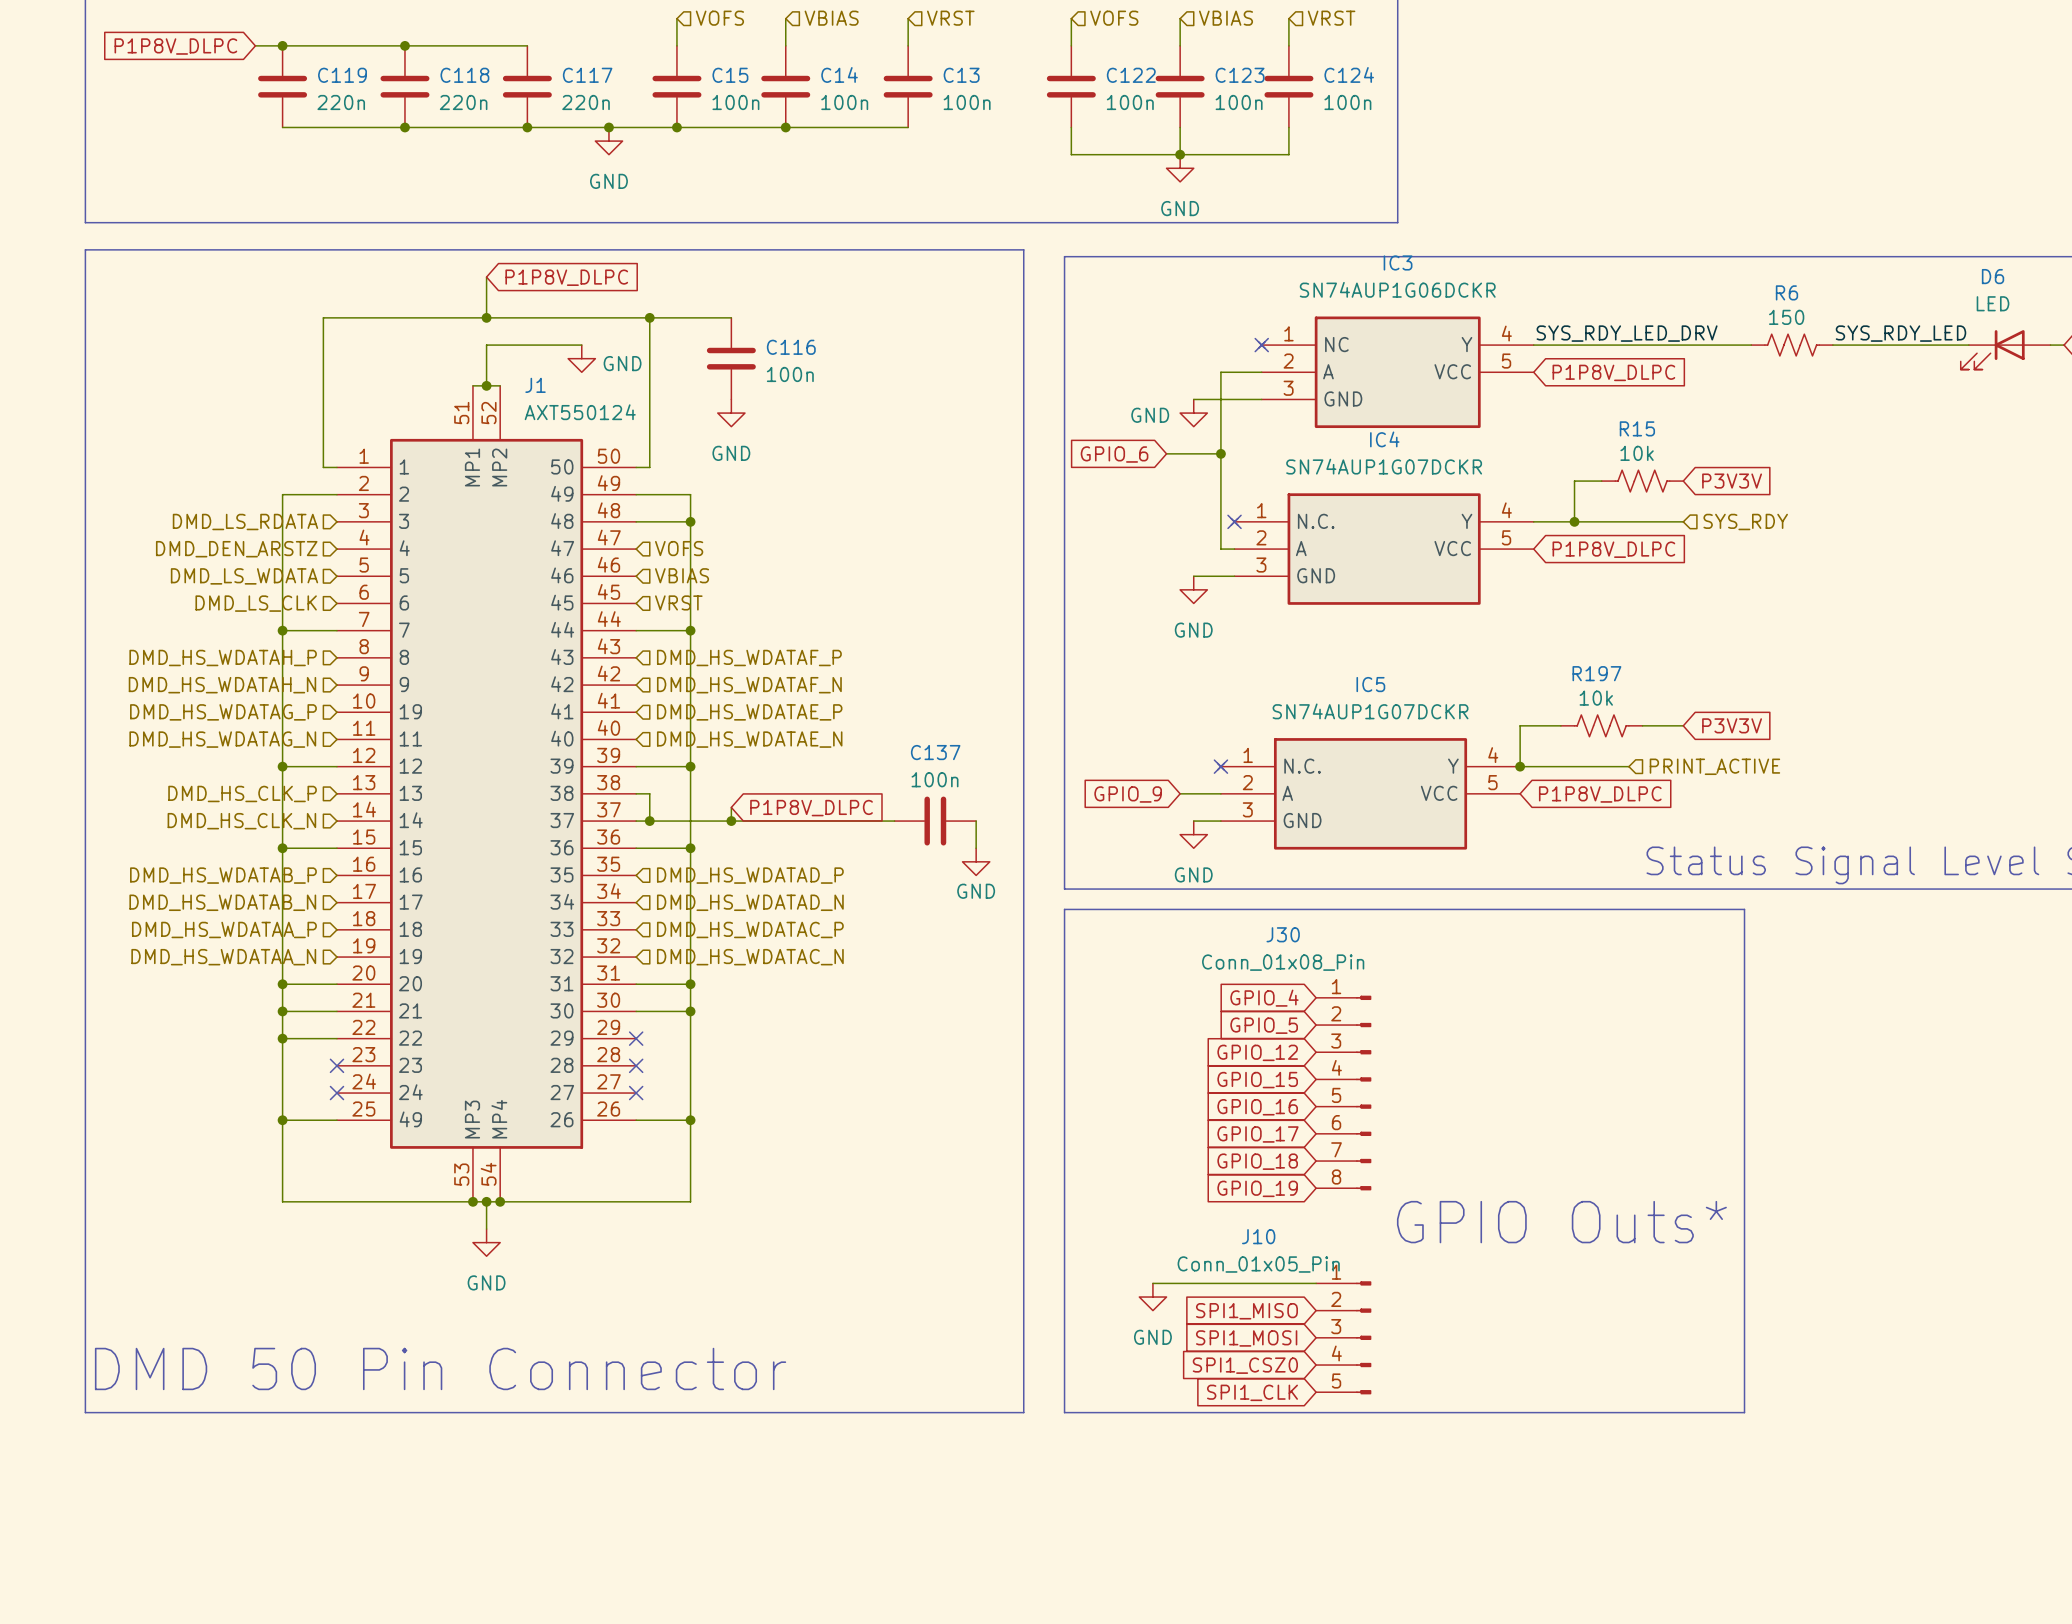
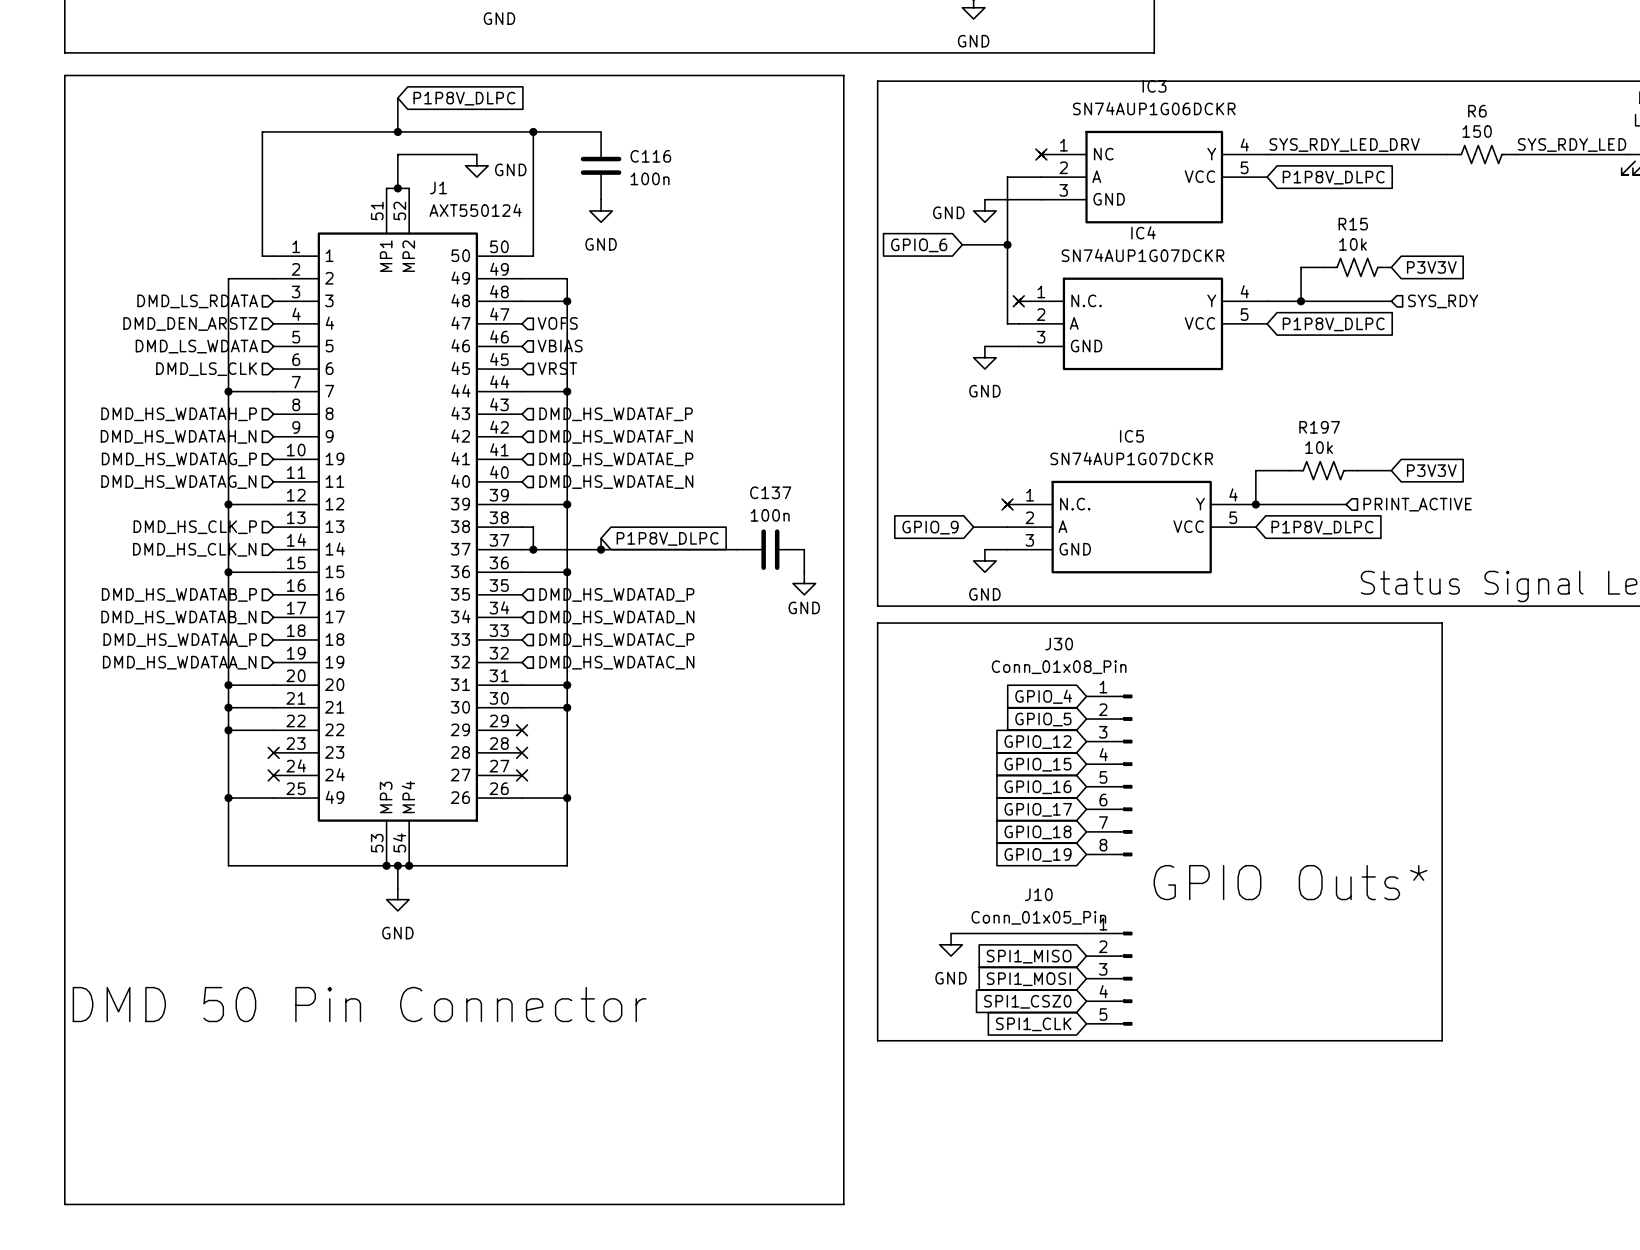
line: (85, 1412) (1023, 1412) -> (64, 1040) (64, 1204) (843, 1204) (843, 1040)

